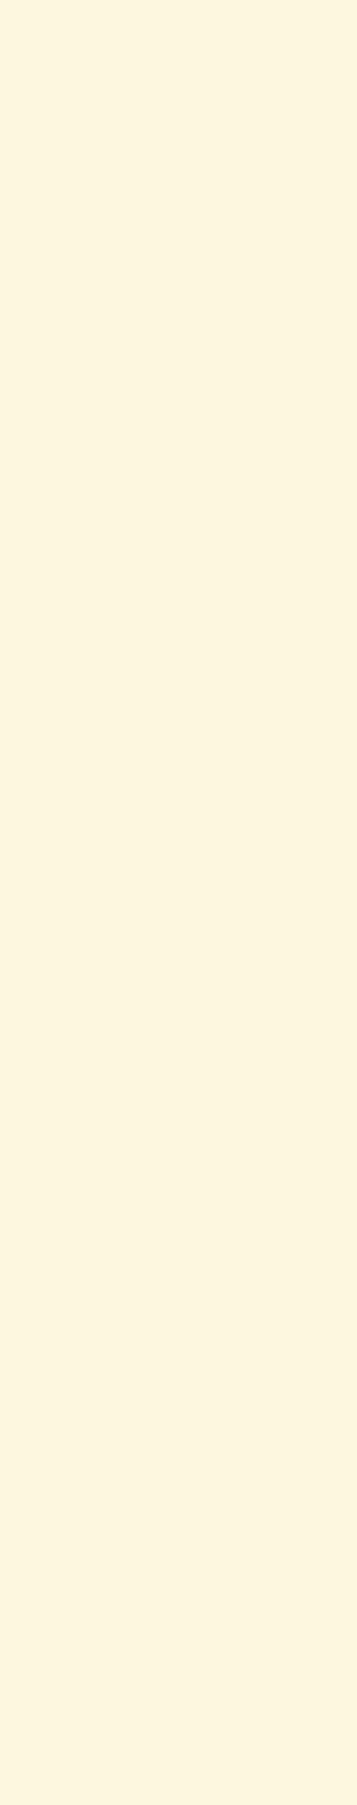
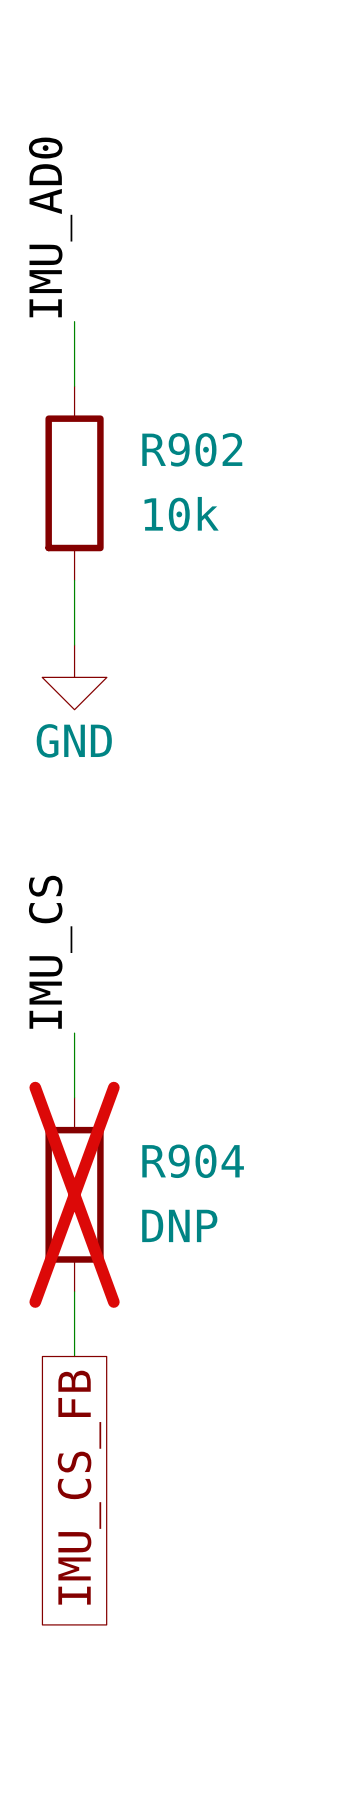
label: none -> IMU_AD0 (50, 227)
wire: none -> (74, 321) (74, 386)
R902: none -> 10k (74, 483)
wire: none -> (74, 580) (74, 645)
power symbol: none -> GND (74, 677)
label: none -> IMU_CS (50, 952)
wire: none -> (74, 1033) (74, 1097)
R904: none -> DNP (74, 1194)
wire: none -> (74, 1291) (74, 1356)
global label: none -> IMU_CS_FB (79, 1487)

